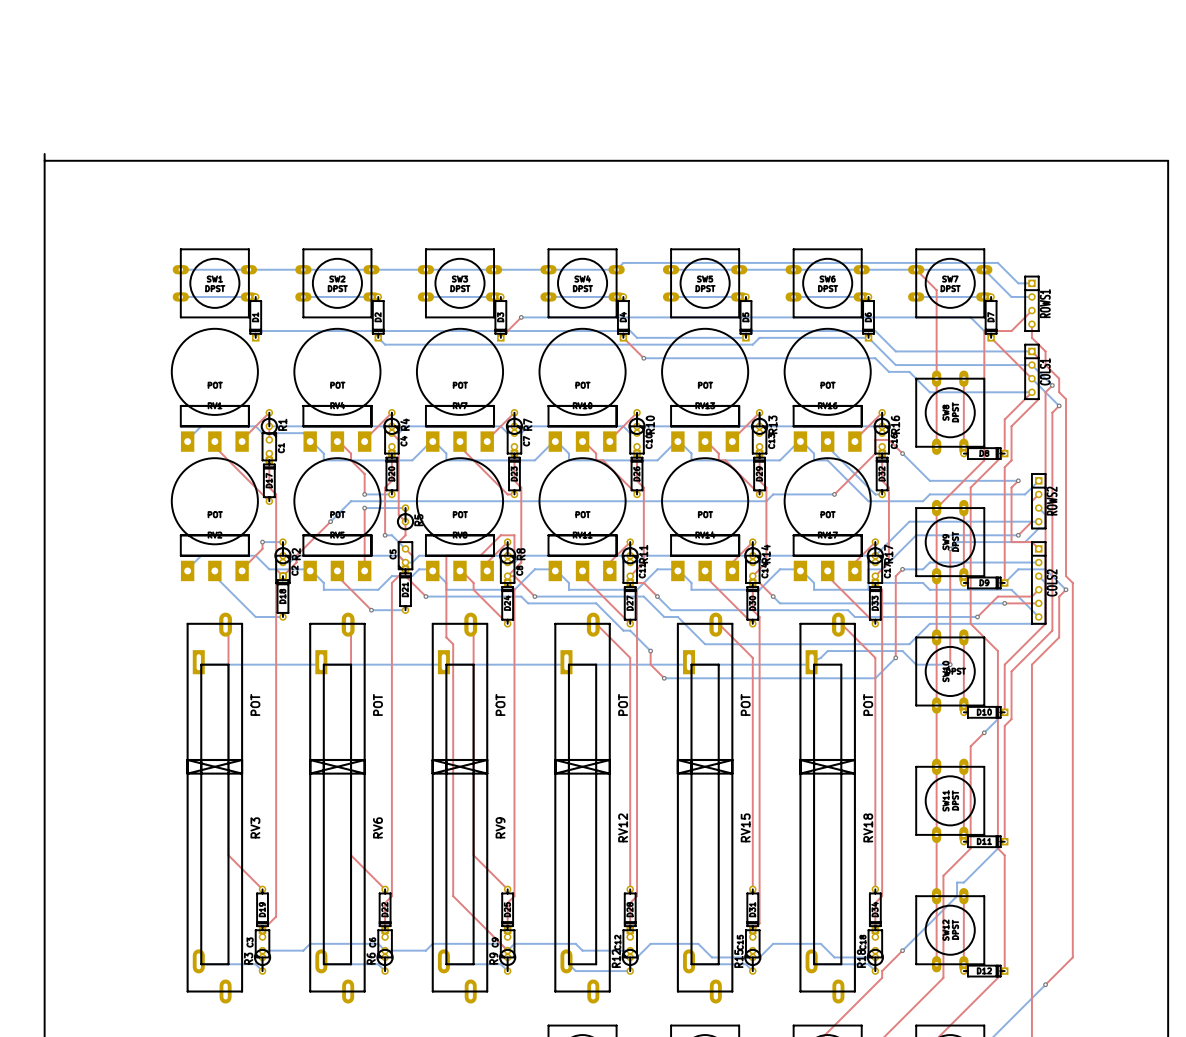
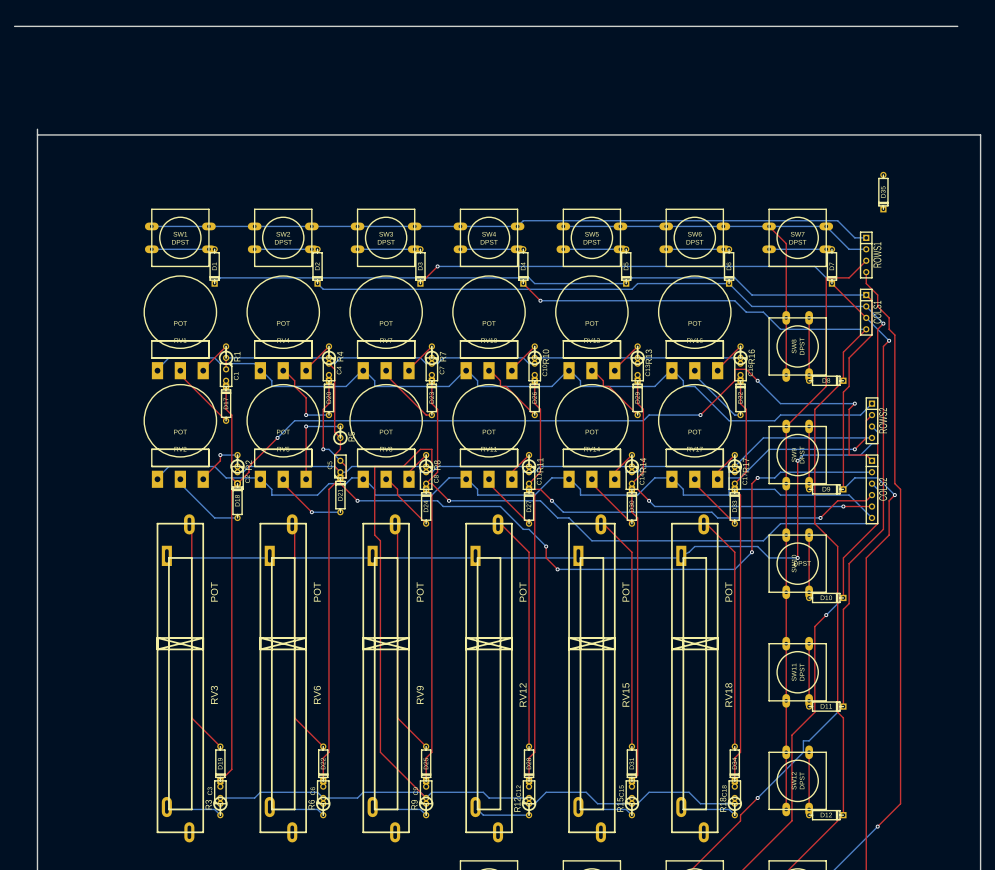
board edge: none -> (14, 26) (957, 26)
part: none -> (883, 192)

